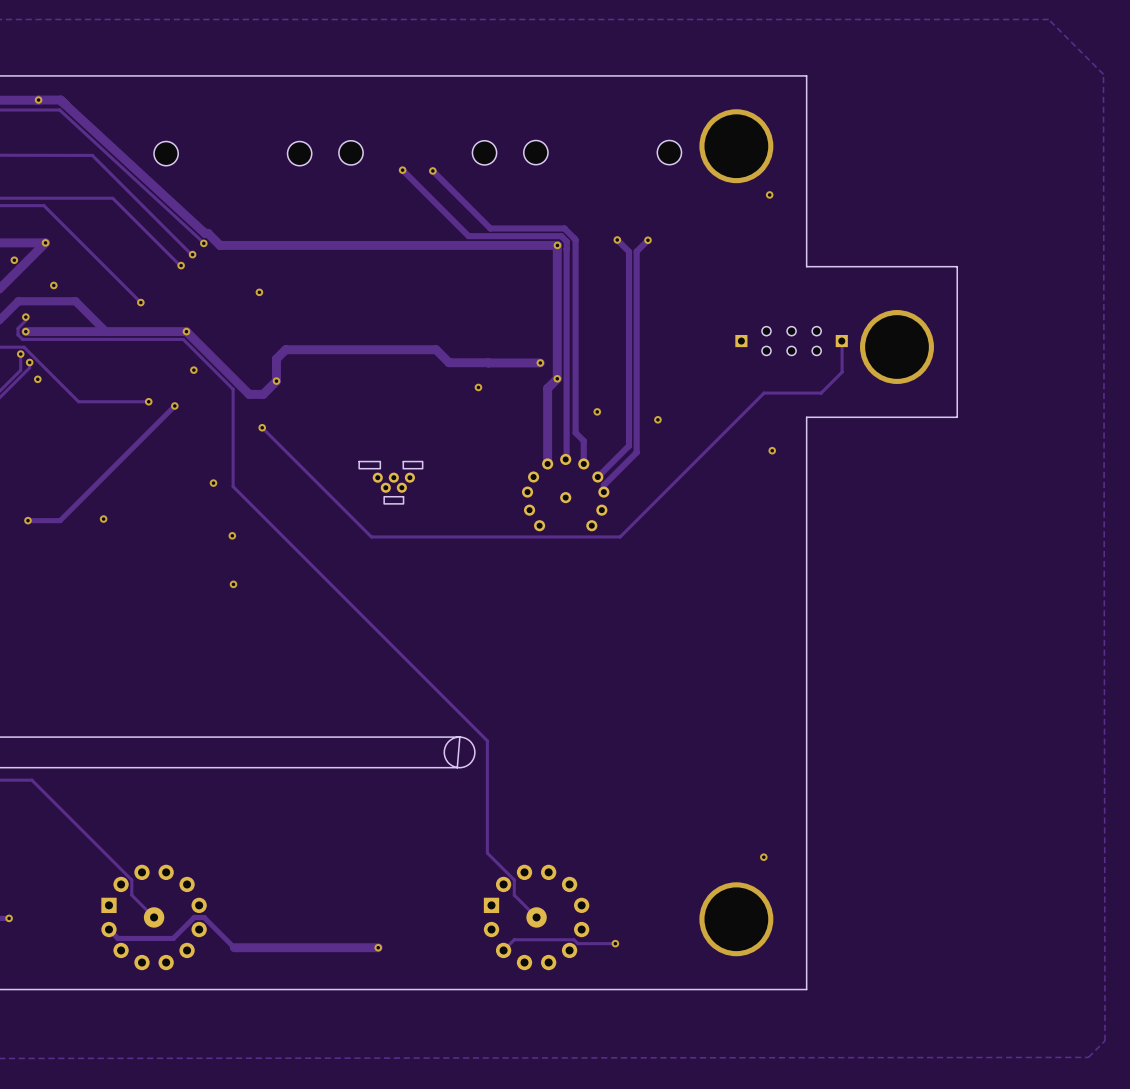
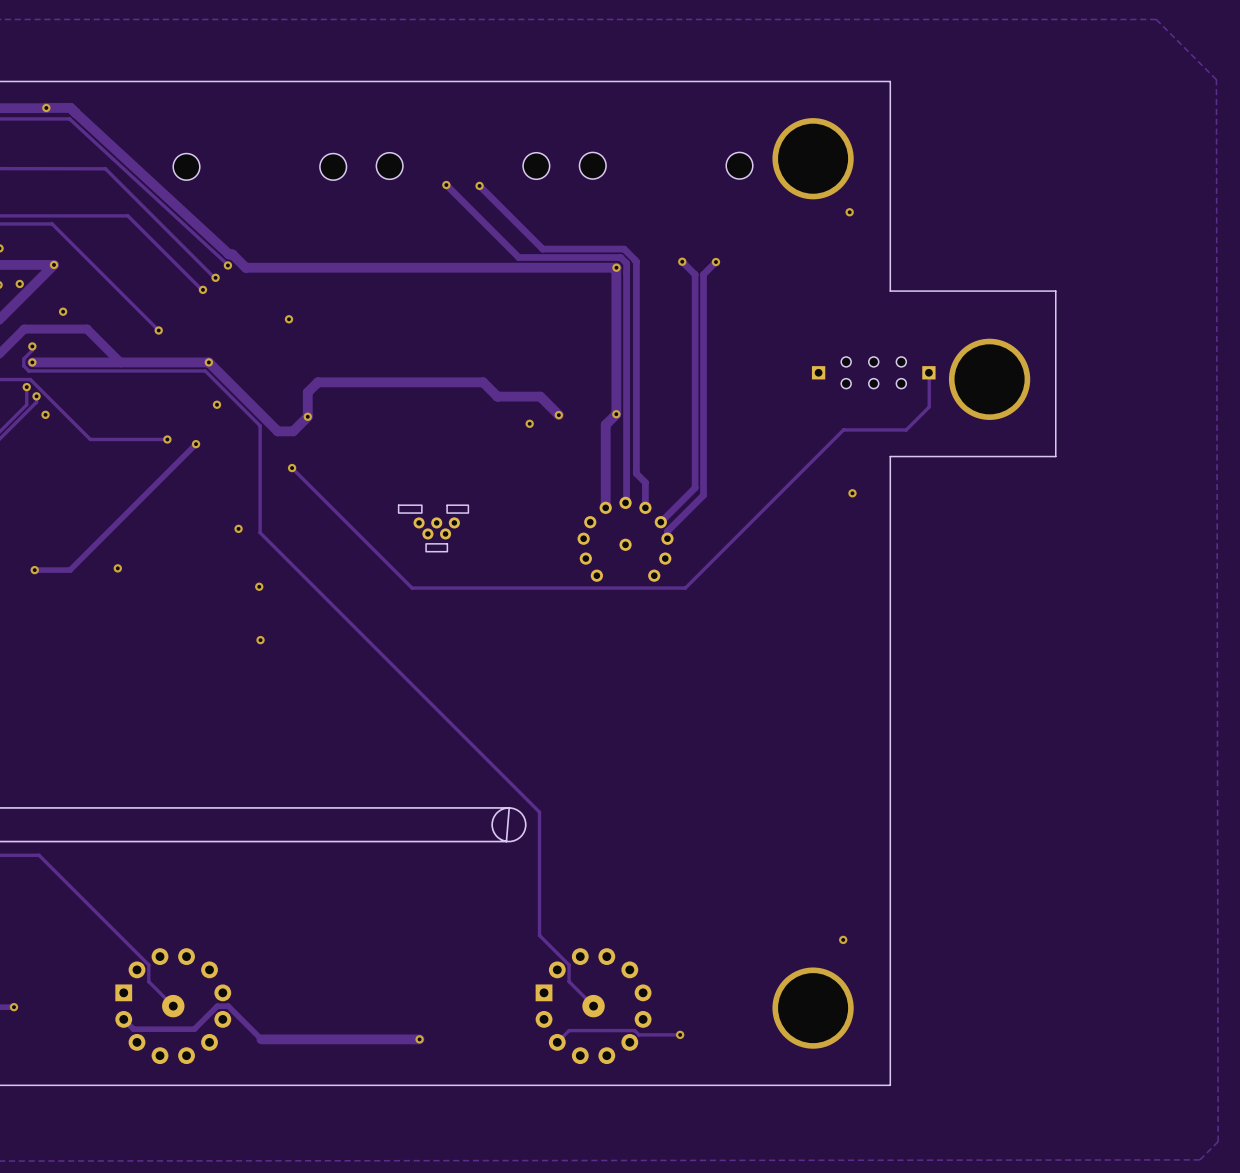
track: (540, 362) (488, 362) -> (558, 415) (540, 396)
via position: (540, 362) -> (558, 415)
via: (597, 411) -> none
via: (657, 419) -> none

